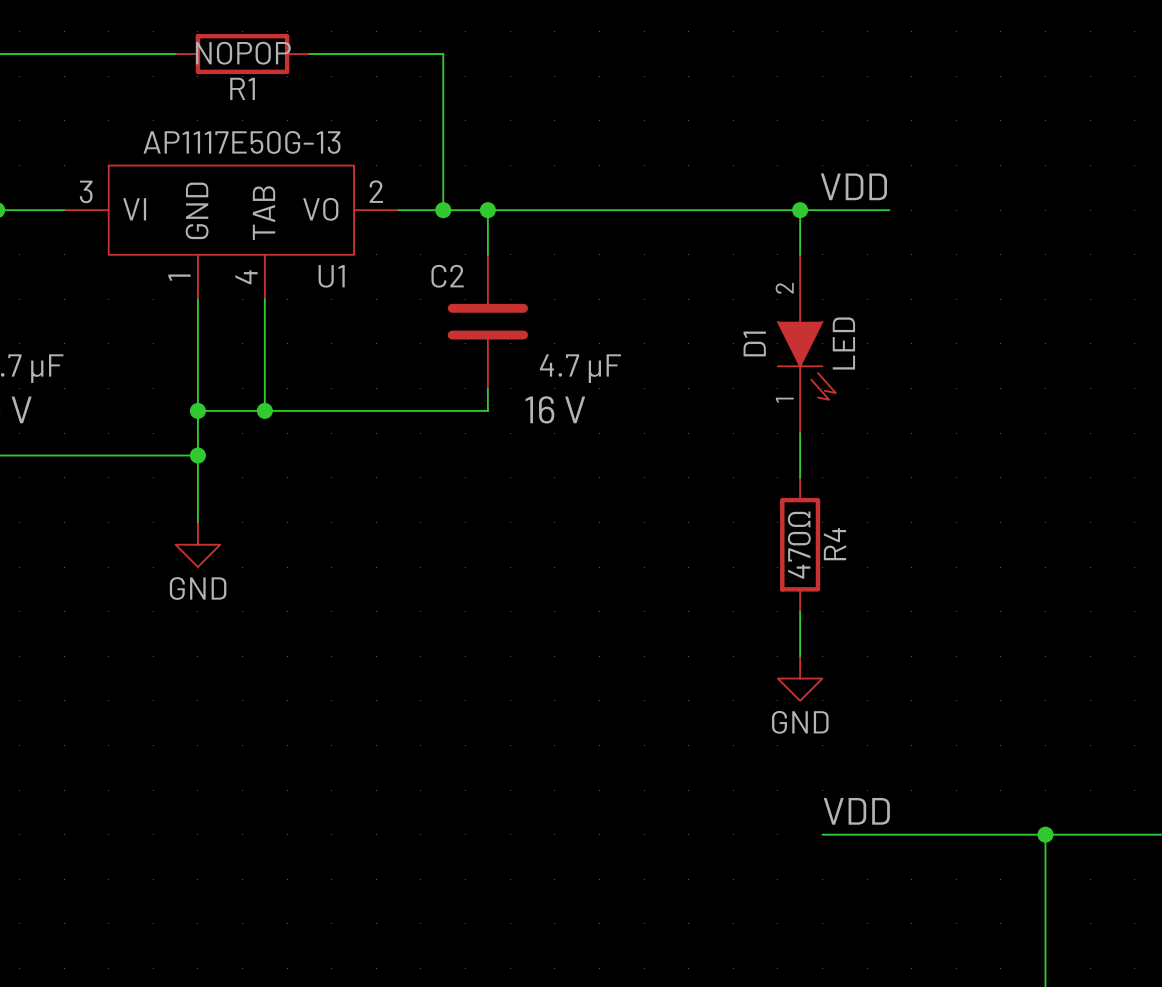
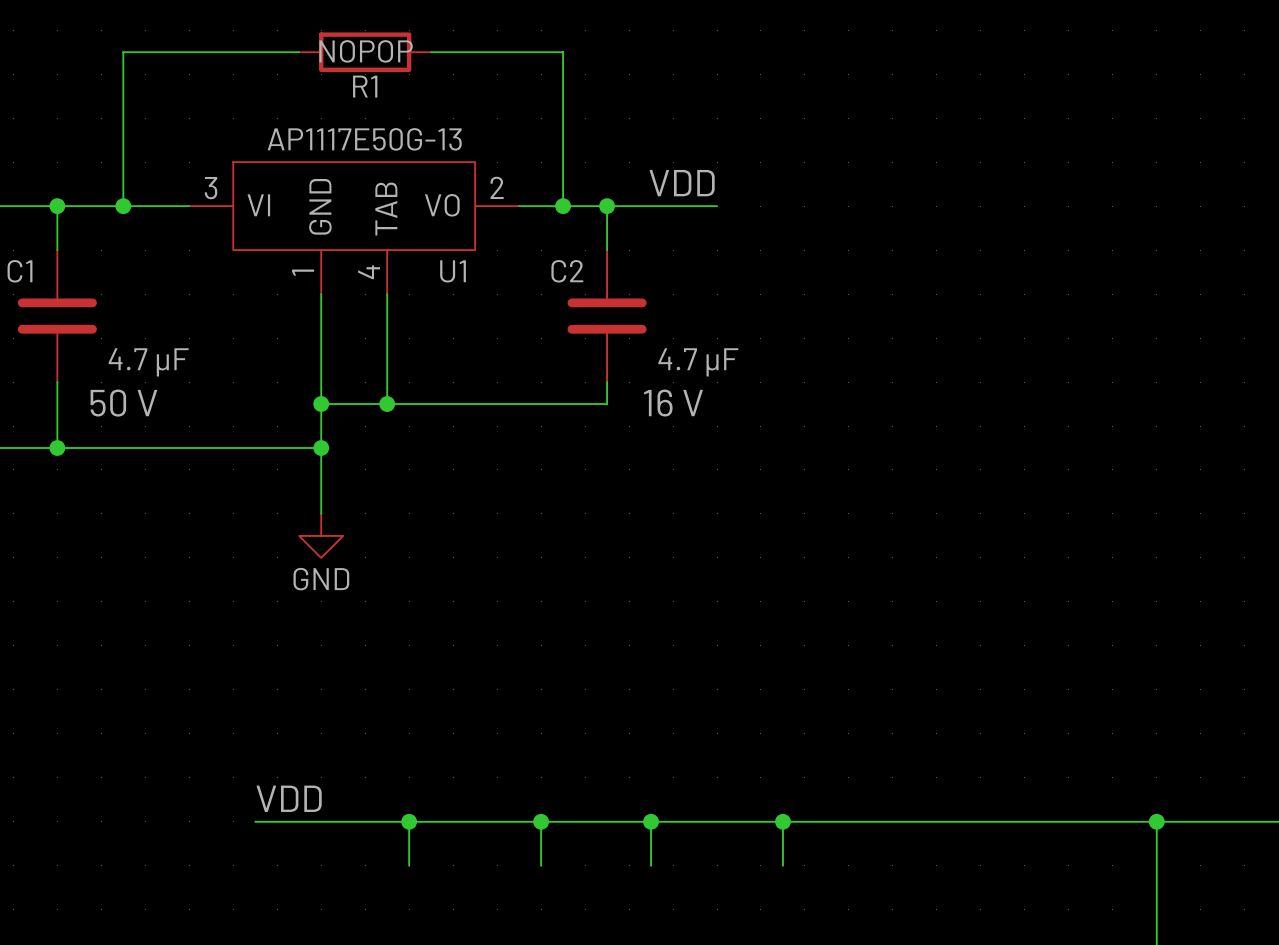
label position: VDD (853, 186) -> VDD (682, 183)
wire: (599, 210) (889, 210) -> none
wire: (800, 210) (800, 254) -> none
junction: (800, 210) -> none
D1: LED (806, 343) -> none
wire: (800, 433) (800, 477) -> none
R4: 470Ω (800, 544) -> none
wire: (800, 611) (800, 656) -> (782, 821) (782, 865)
power symbol: GND (800, 678) -> none
label: none -> VDD (289, 798)
label: VDD (856, 811) -> none
wire: none -> (255, 821) (936, 821)
wire: none -> (409, 821) (409, 865)
junction: none -> (409, 821)
wire: none -> (541, 821) (541, 865)
junction: none -> (541, 821)
wire: none -> (651, 821) (651, 865)
junction: none -> (651, 821)
junction: none -> (782, 821)

